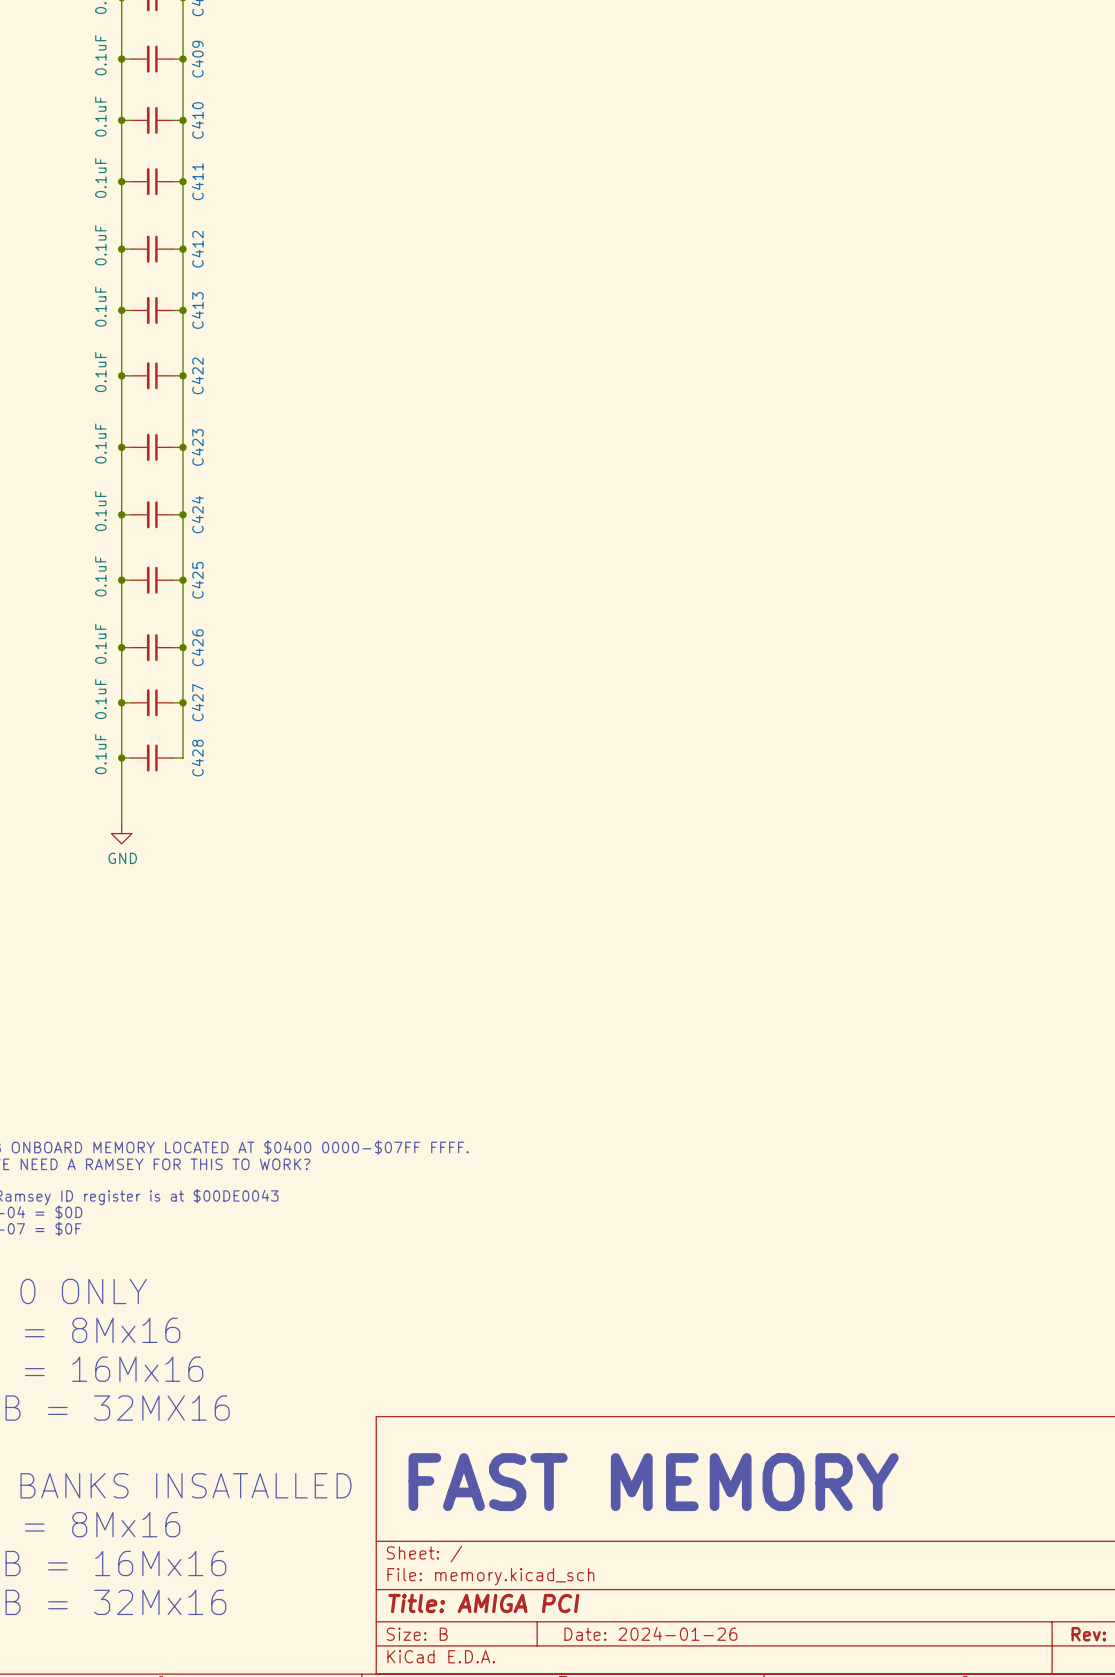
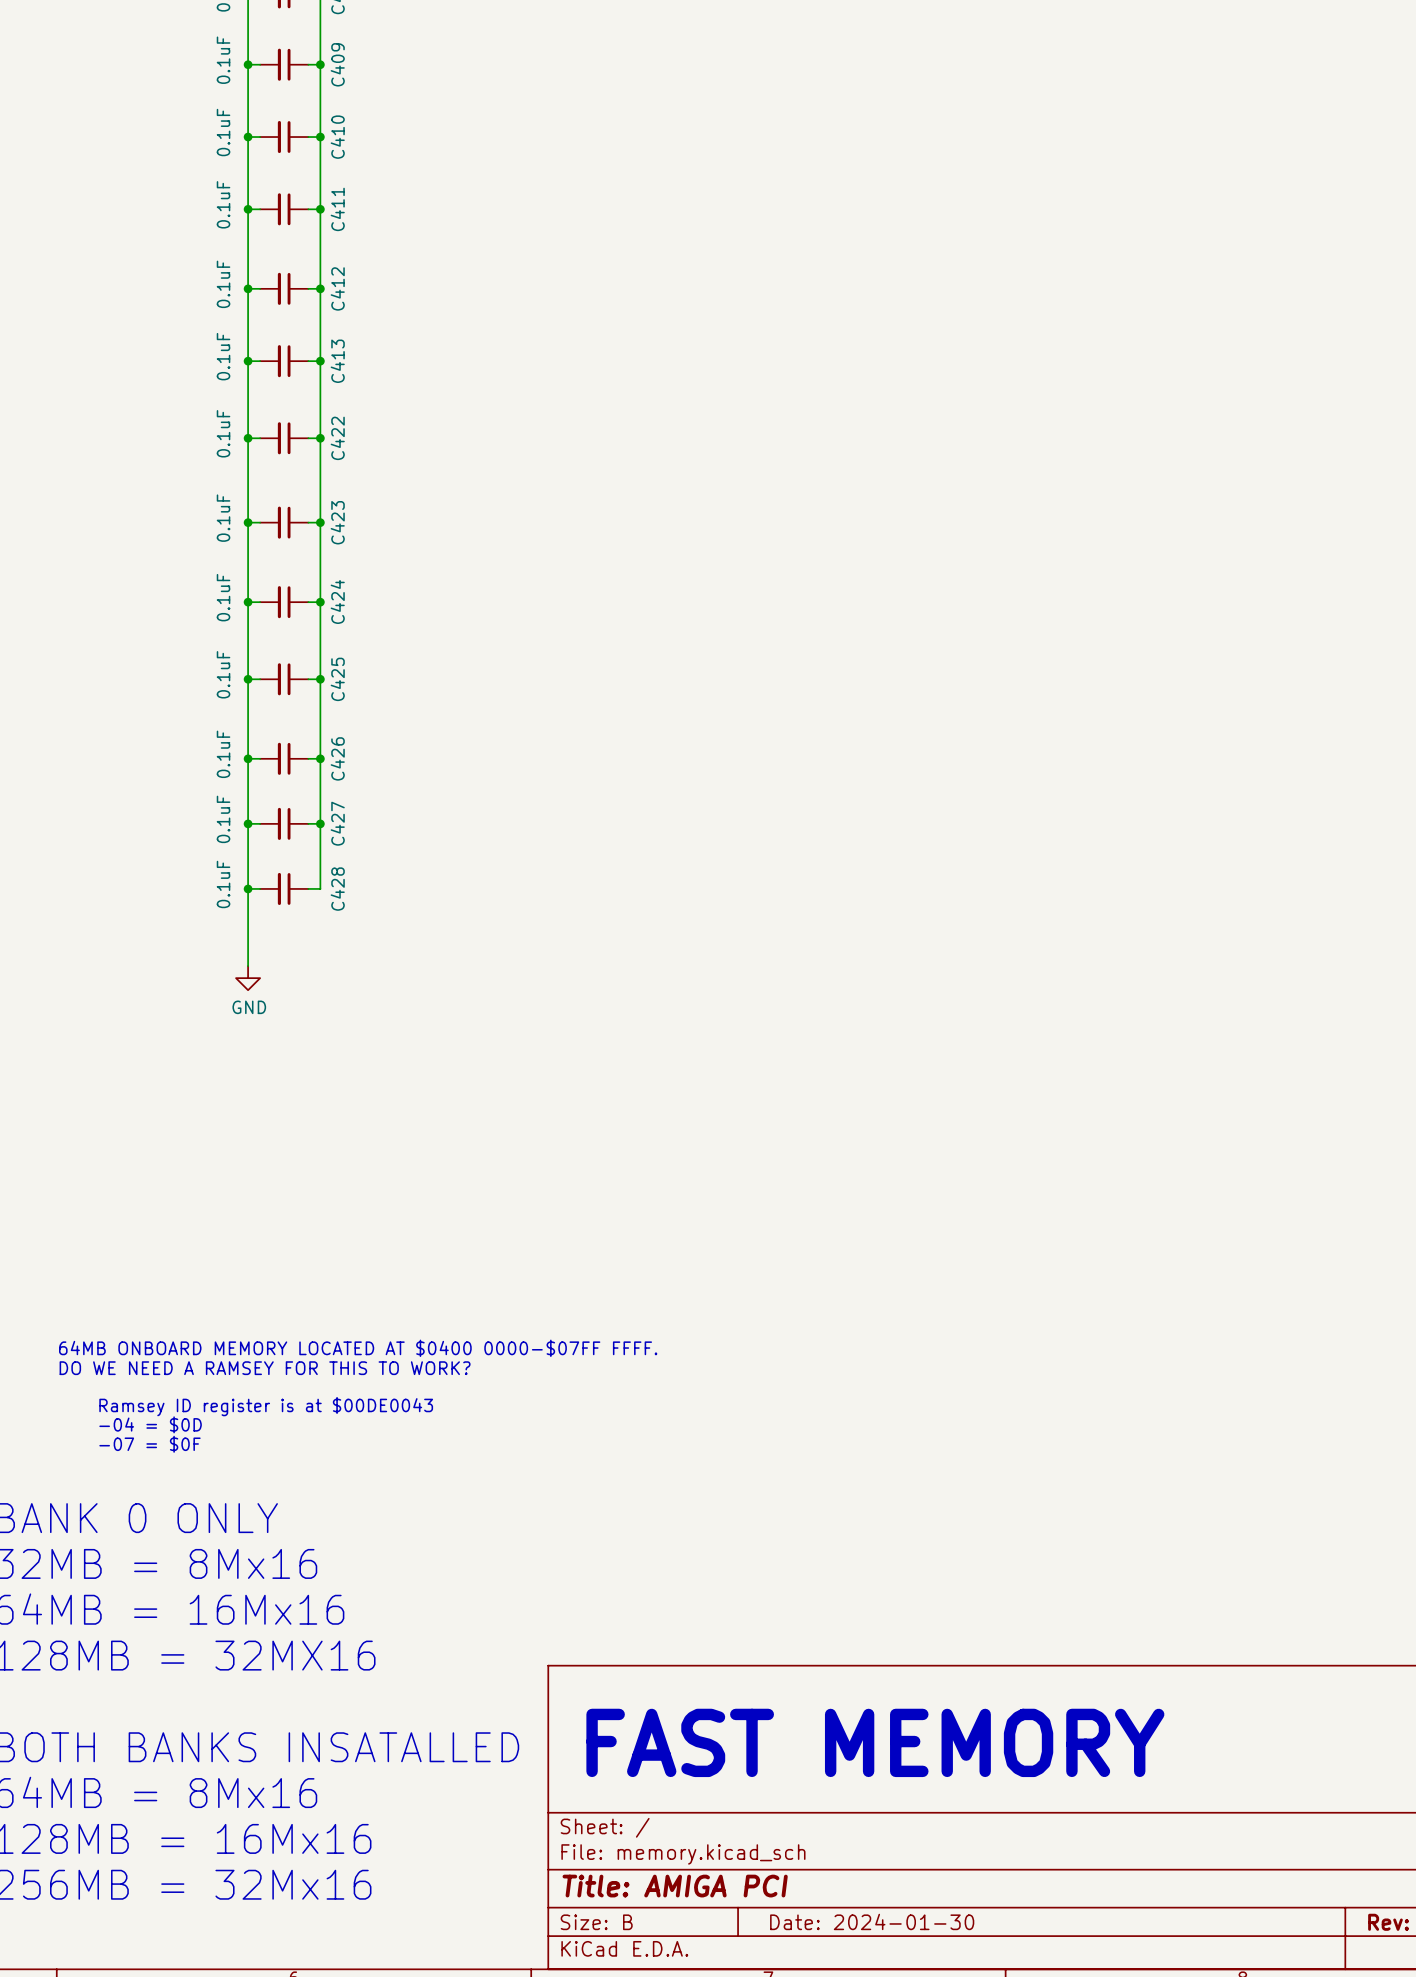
title block: Date: 2024-01-26 (650, 1633) -> Date: 2024-01-30 (872, 1921)

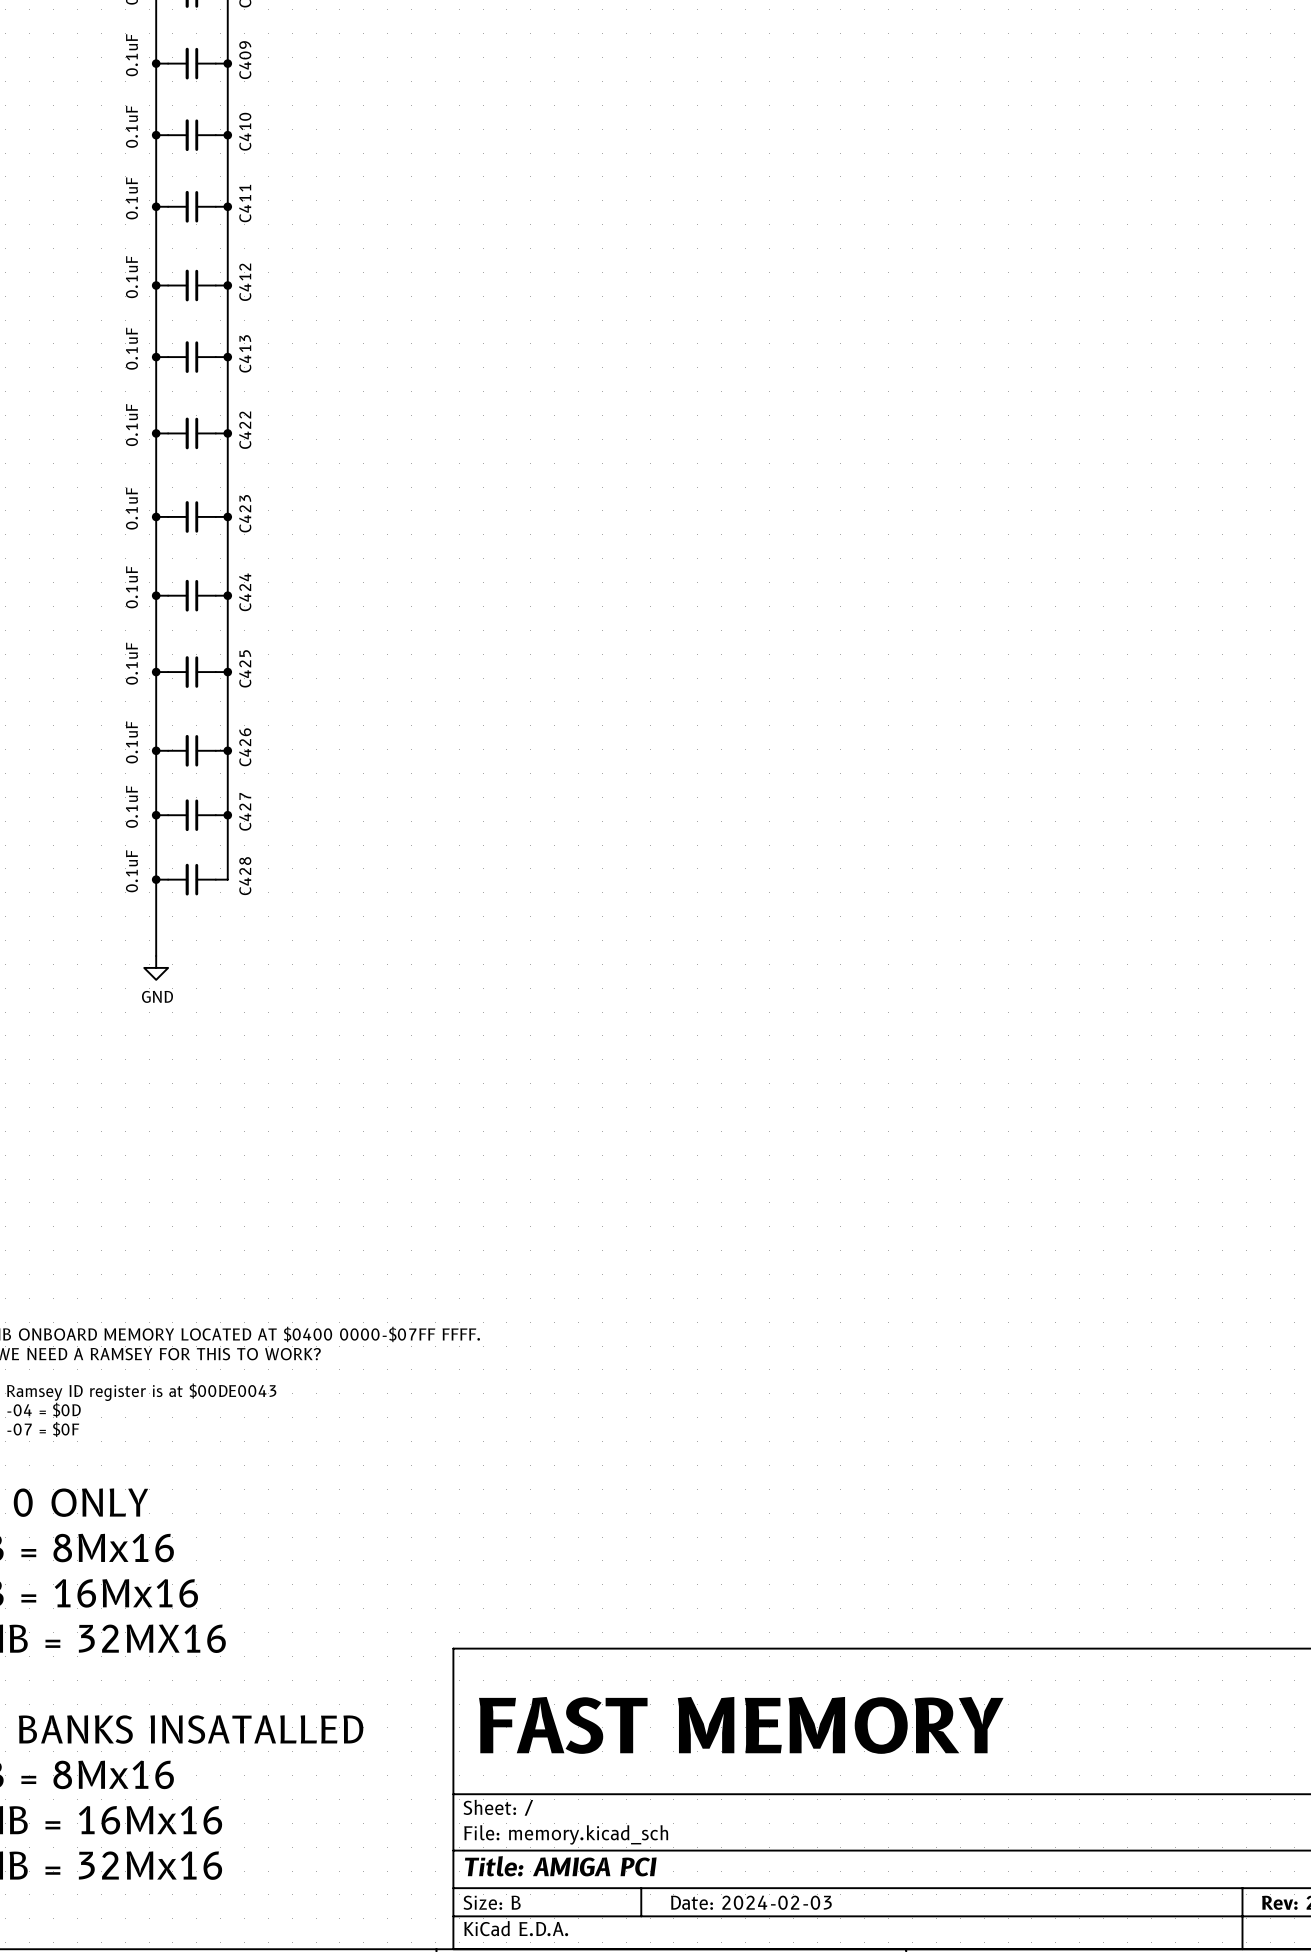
title block: Date: 2024-01-30 (872, 1921) -> Date: 2024-02-03 (751, 1902)

